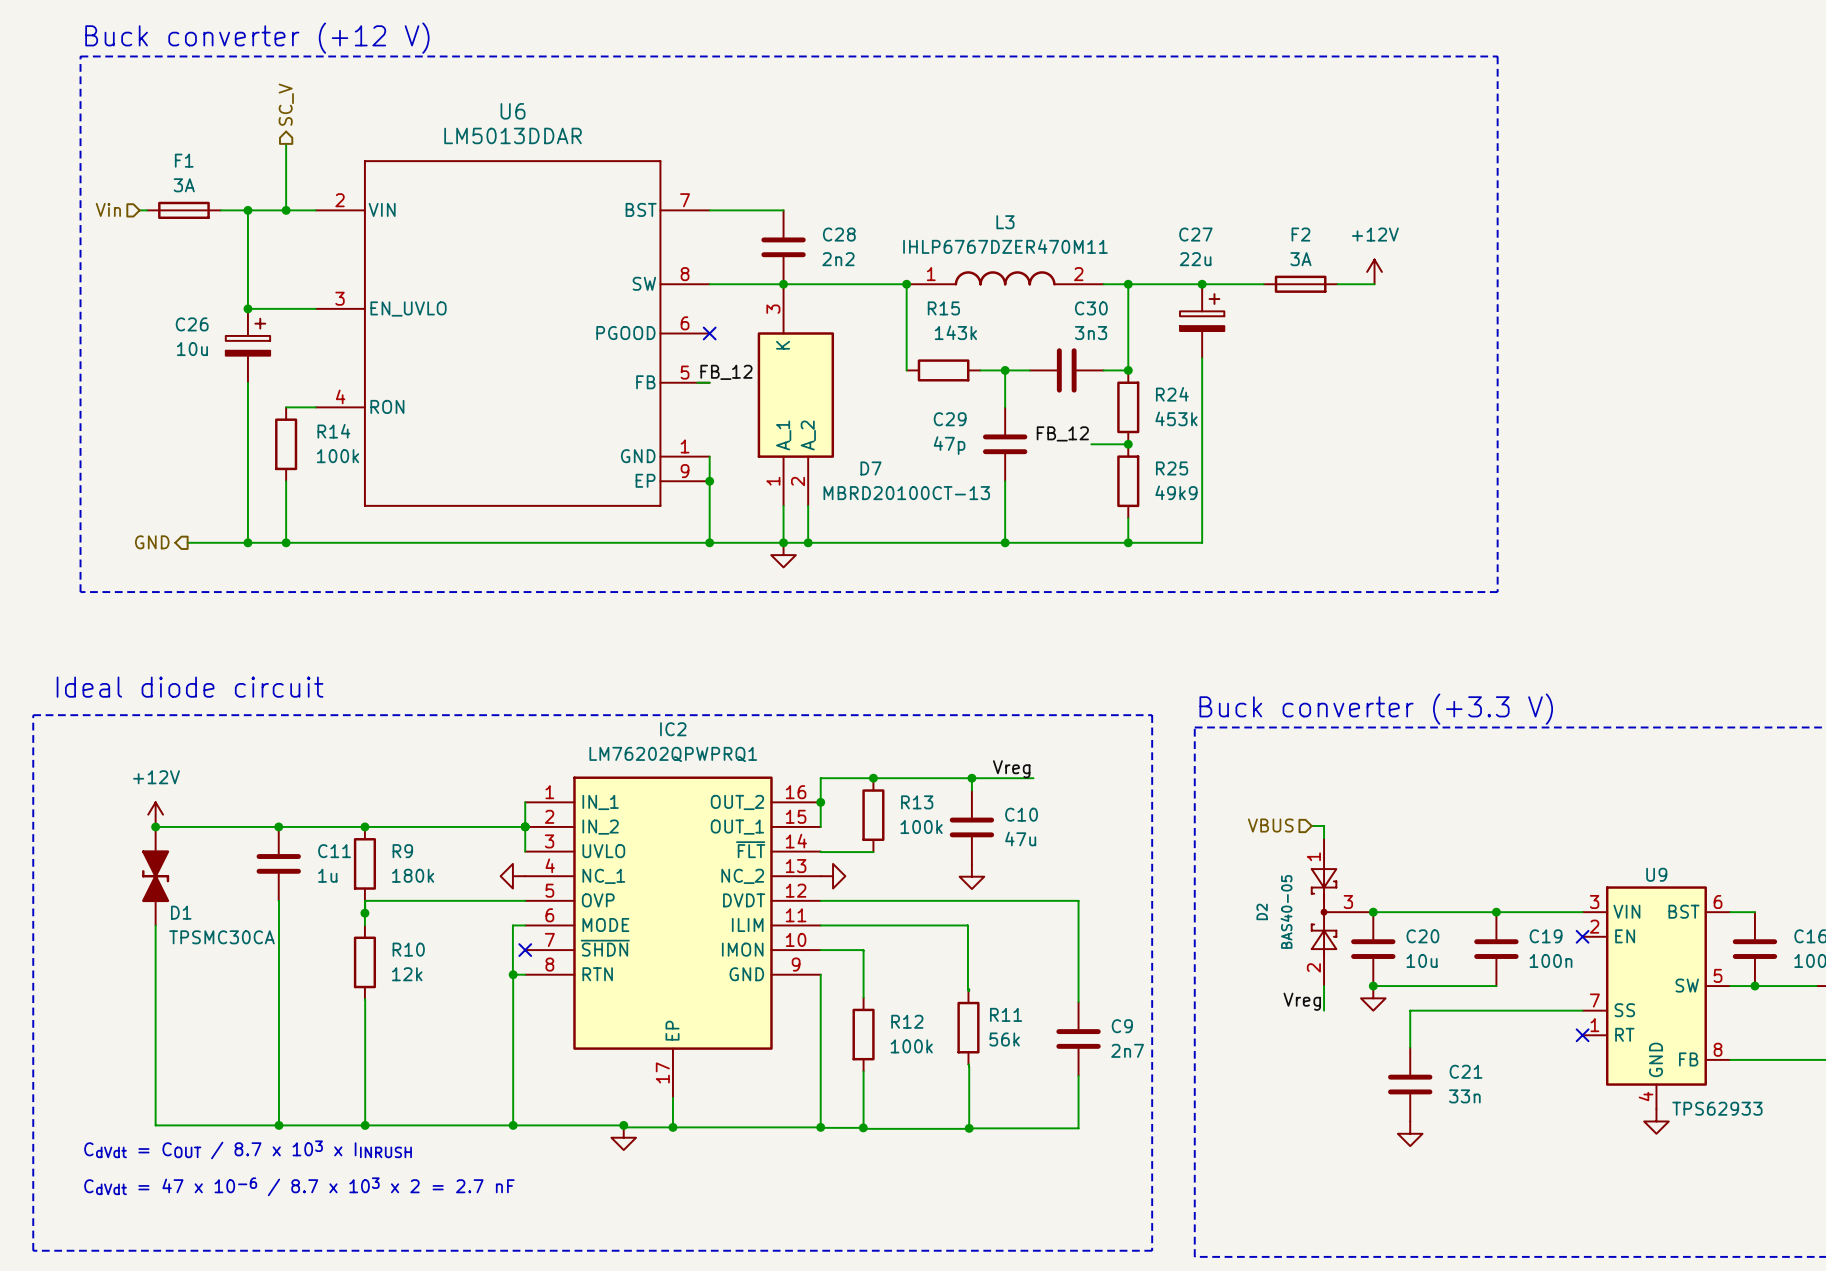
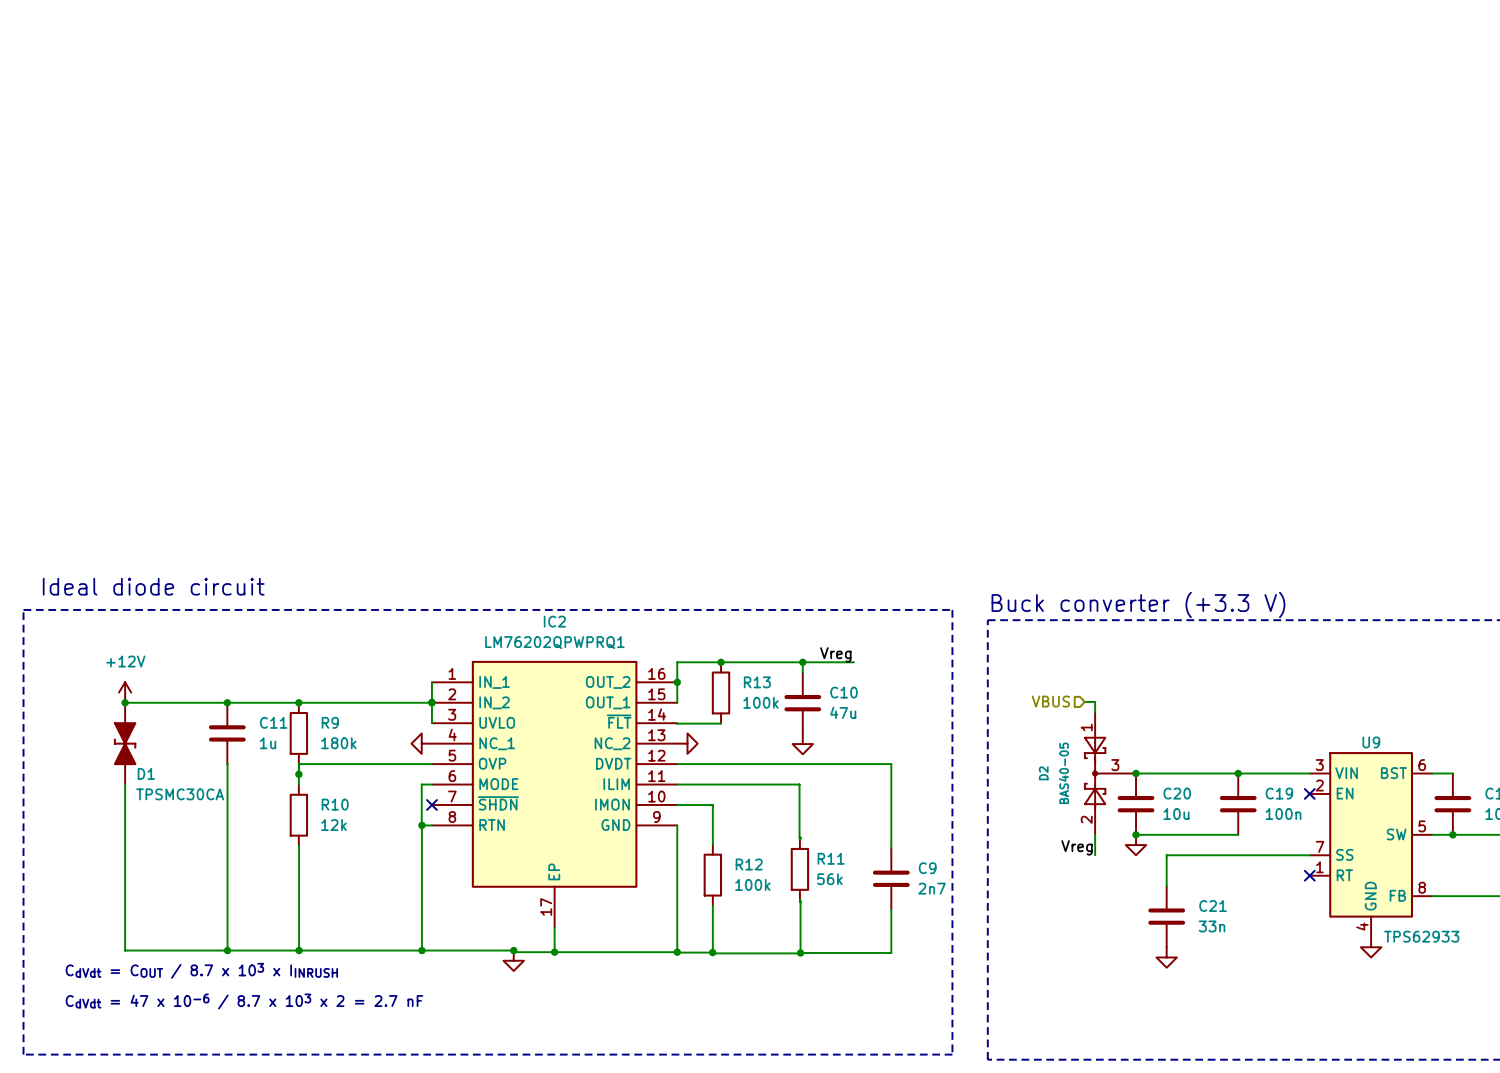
text: Buck converter (+12 V) (257, 38) -> none
line: (80, 56) (1497, 56) (1497, 592) (80, 592) (80, 56) -> none
hierarchical label: SC_V (286, 104) -> none
wire: (286, 143) (286, 210) -> none
hierarchical label: Vin (108, 209) -> none
wire: (139, 210) (147, 210) -> none
F1: 3A (183, 210) -> none
wire: (220, 210) (315, 210) -> none
wire: (247, 210) (247, 308) (315, 308) -> none
junction: (247, 210) -> none
junction: (286, 210) -> none
wire: (709, 210) (783, 210) -> none
C28: 2n2 (783, 247) -> none
power symbol: +12V (1374, 271) -> none
L3: IHLP6767DZER470M11 (1005, 278) -> none
wire: (709, 284) (906, 284) (906, 370) -> none
junction: (783, 284) -> none
junction: (906, 284) -> none
wire: (1103, 284) (1263, 284) -> none
wire: (1128, 284) (1128, 370) (1103, 370) -> none
junction: (1128, 284) -> none
junction: (1202, 284) -> none
F2: 3A (1300, 284) -> none
wire: (1337, 284) (1374, 284) -> none
junction: (247, 308) -> none
C27: 22u (1202, 321) -> none
U6: LM5013DDAR (512, 333) -> none
no-connect mark: (709, 333) -> none
C26: 10u (247, 345) -> none
wire: (1202, 358) (1202, 542) (187, 542) -> none
R15: 143k (943, 370) -> none
wire: (980, 370) (1029, 370) -> none
wire: (1005, 370) (1005, 407) -> none
junction: (1005, 370) -> none
C30: 3n3 (1066, 370) -> none
junction: (1128, 370) -> none
label: FB_12 (726, 372) -> none
wire: (247, 382) (247, 542) -> none
wire: (697, 382) (709, 382) -> none
D7: MBRD20100CT-13 (795, 395) -> none
wire: (286, 407) (315, 407) -> none
R24: 453k (1128, 407) -> none
label: FB_12 (1062, 433) -> none
R14: 100k (286, 444) -> none
C29: 47p (1005, 444) -> none
wire: (1091, 444) (1128, 444) -> none
junction: (1128, 444) -> none
wire: (709, 456) (709, 542) -> none
wire: (286, 481) (286, 542) -> none
junction: (709, 481) -> none
wire: (1005, 481) (1005, 542) -> none
R25: 49k9 (1128, 481) -> none
wire: (783, 505) (783, 542) -> none
wire: (808, 505) (808, 542) -> none
wire: (1128, 518) (1128, 542) -> none
hierarchical label: GND (152, 542) -> none
junction: (247, 542) -> none
junction: (286, 542) -> none
junction: (709, 542) -> none
junction: (783, 542) -> none
junction: (808, 542) -> none
junction: (1005, 542) -> none
junction: (1128, 542) -> none
power symbol: (783, 555) -> none

